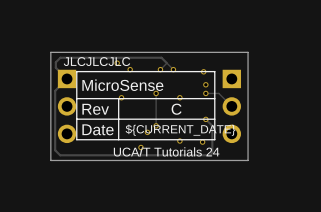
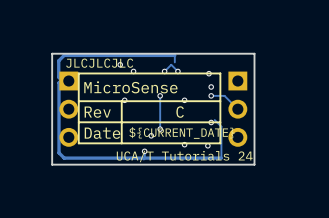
track: none -> (174, 62) (174, 55) (64, 55) (58, 60) (58, 77) (63, 78) (59, 82) (59, 152) (64, 158) (221, 158) (221, 126) (214, 120)
track: (166, 63) (161, 57) (60, 57) (55, 62) (55, 67) (67, 78) (55, 90) (55, 150) (60, 155) (210, 155) (212, 153) (212, 125) (205, 119) -> none

